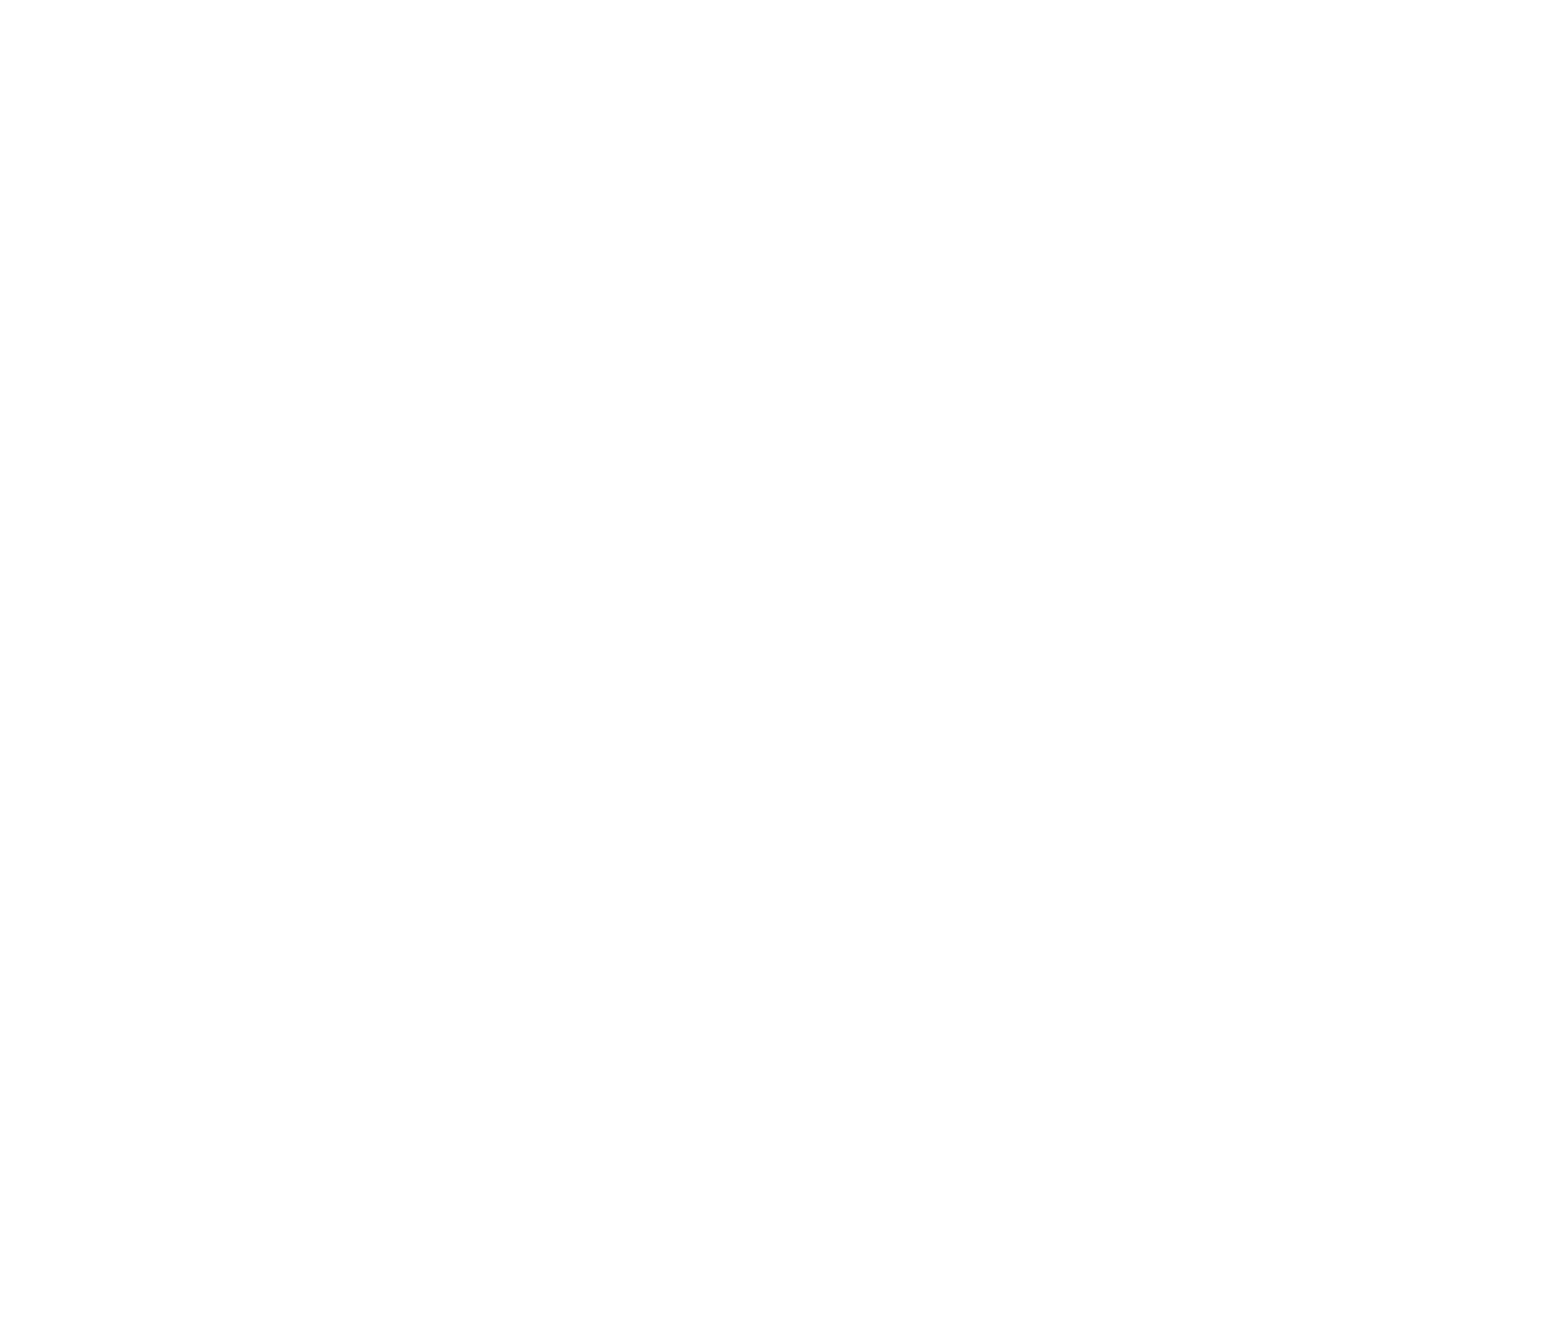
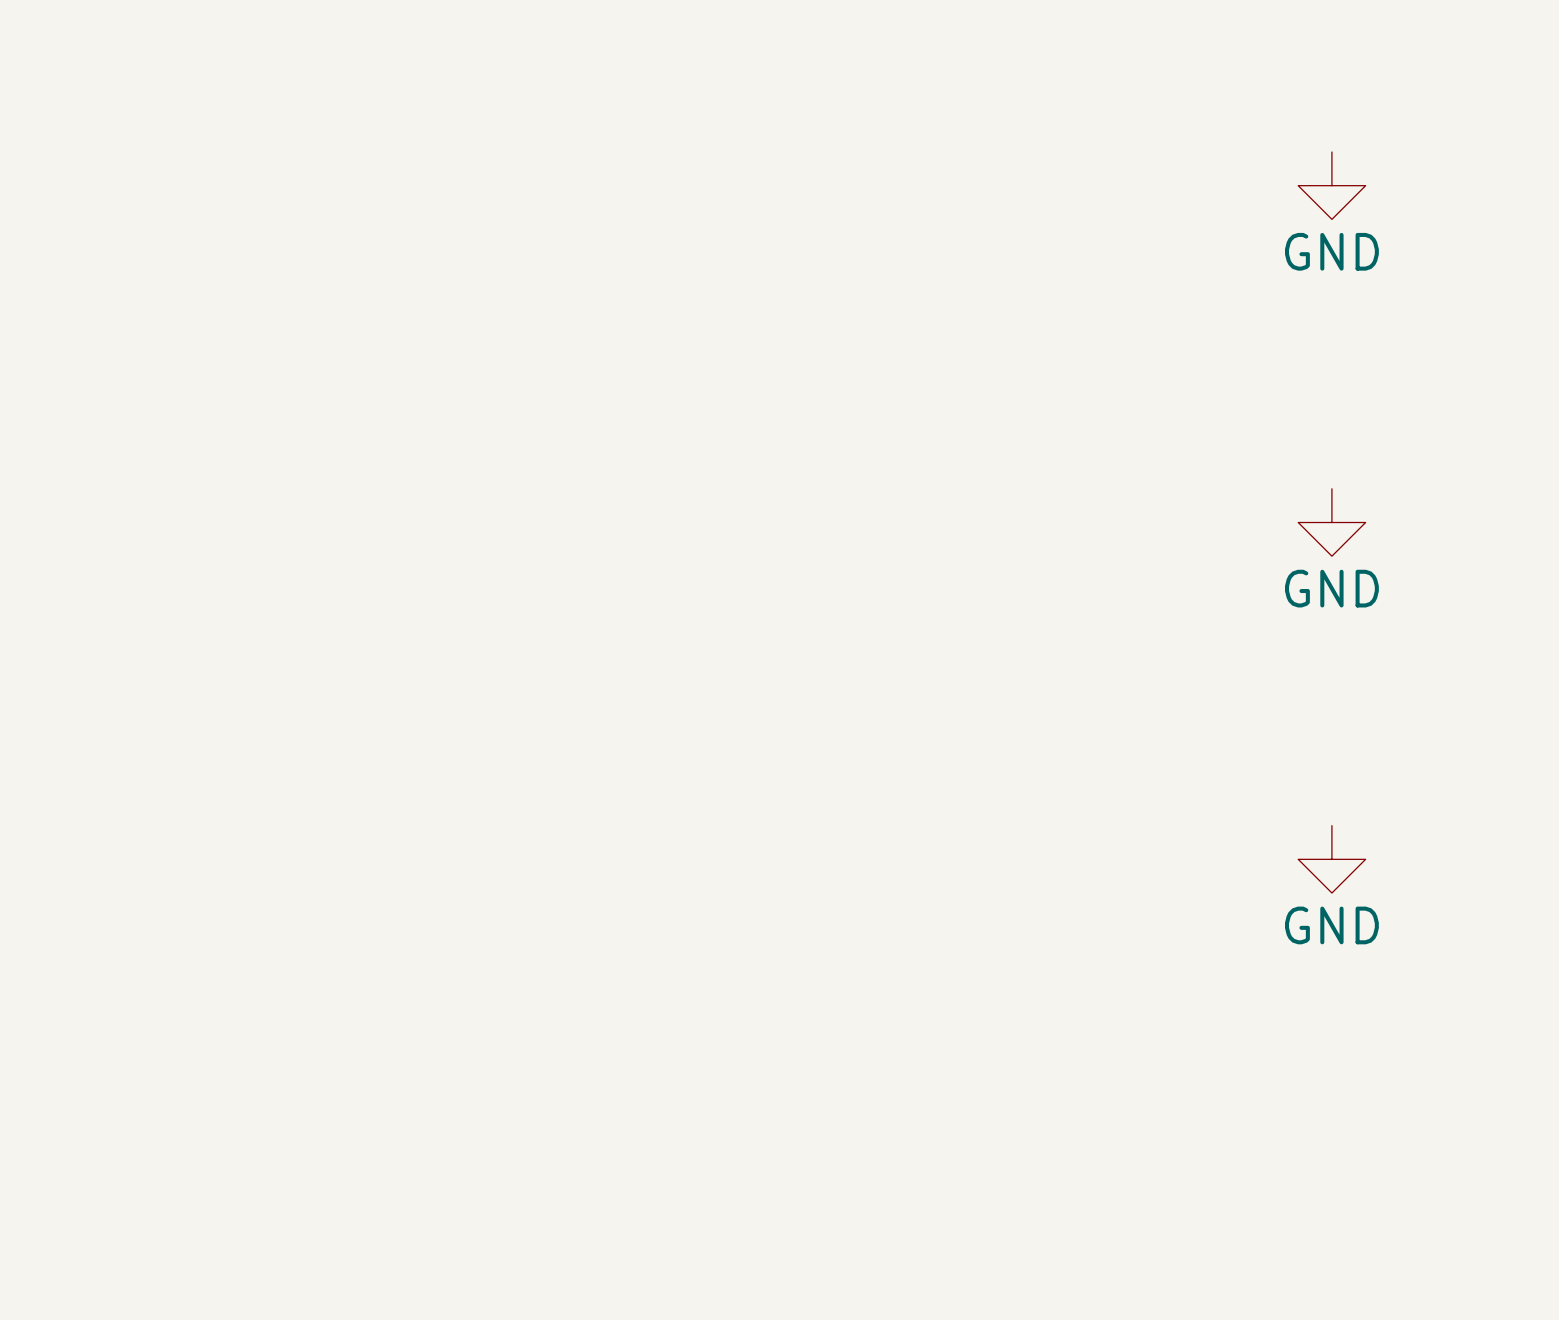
power symbol: none -> GND (1331, 185)
power symbol: none -> GND (1331, 522)
power symbol: none -> GND (1331, 859)

